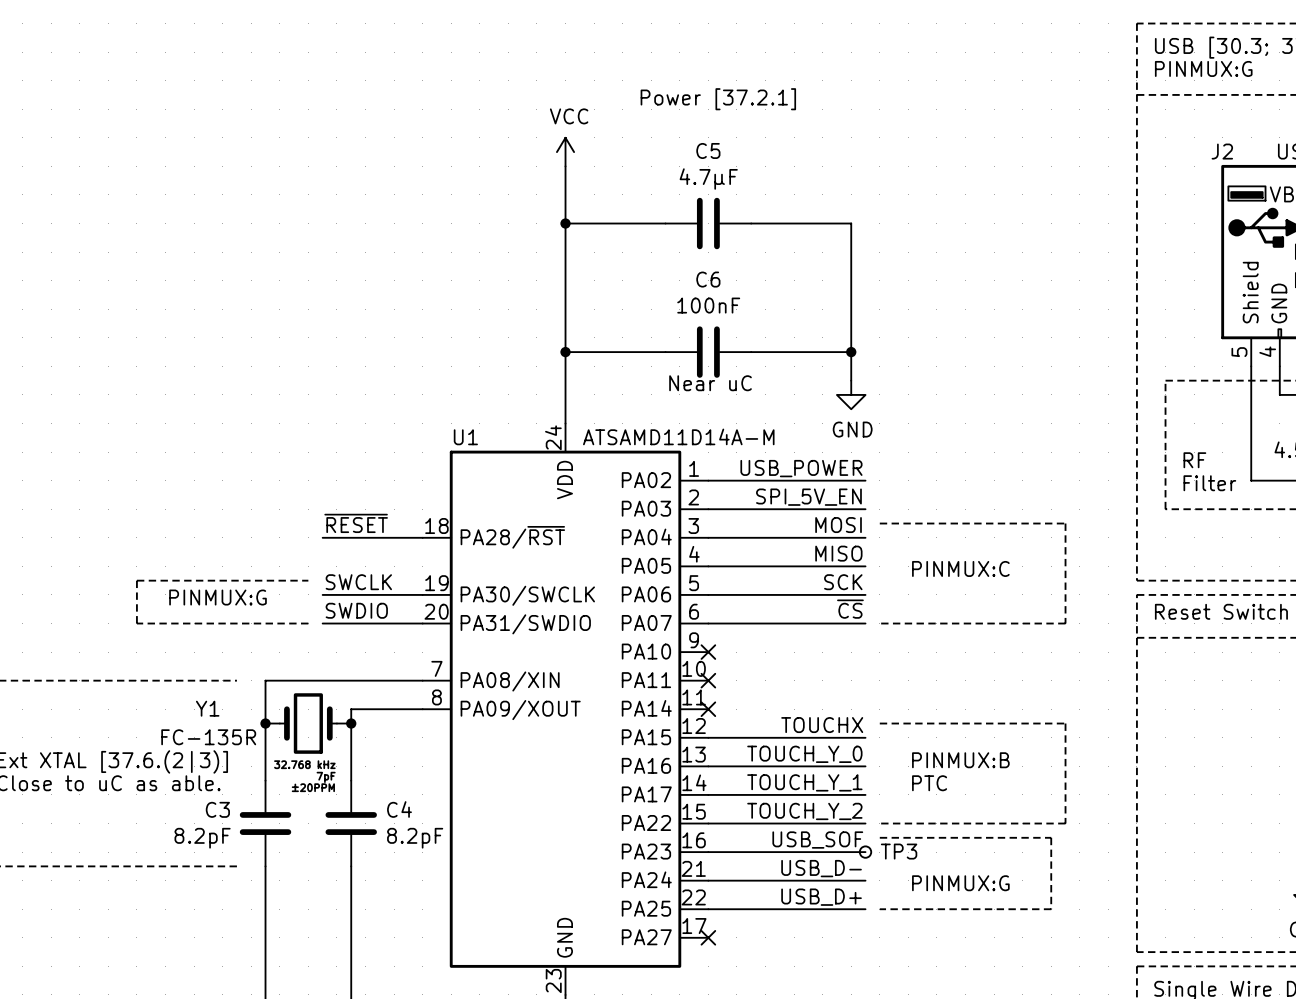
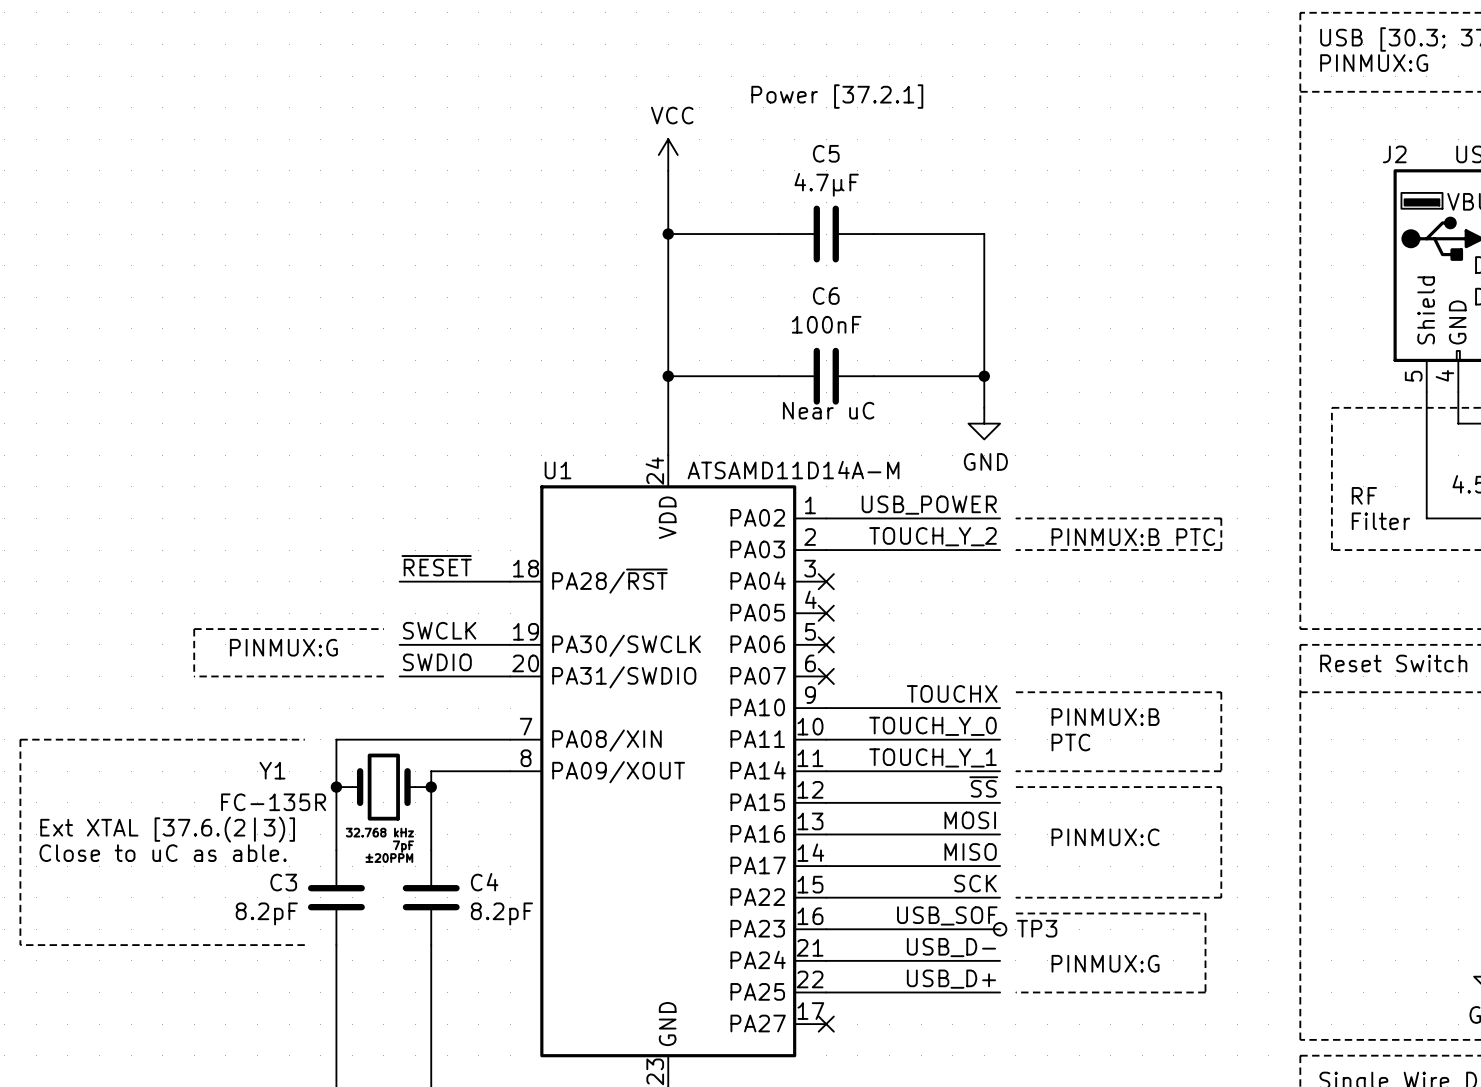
line: none -> (1015, 518) (1221, 518) (1221, 550) (1015, 550)
label: SPI_5V_EN (808, 497) -> TOUCH_Y_2 (933, 536)
text: none -> PINMUX:B PTC (1133, 537)
line: (879, 523) (1065, 523) (1065, 623) (879, 623) -> none
label: MOSI (838, 525) -> none
wire: (708, 537) (865, 537) -> none
no-connect mark: none -> (826, 581)
label: MISO (838, 553) -> none
wire: (708, 566) (865, 566) -> (826, 708) (1000, 708)
no-connect mark: none -> (826, 613)
text position: PINMUX:C (960, 568) -> PINMUX:C (1105, 837)
label: SCK (843, 582) -> none
wire: (708, 594) (865, 594) -> (826, 739) (1000, 739)
no-connect mark: none -> (826, 644)
label: ~{CS} (850, 609) -> none
wire: (708, 623) (865, 623) -> (826, 771) (1000, 771)
no-connect mark: none -> (826, 676)
line: none -> (1015, 692) (1221, 692) (1221, 771) (1015, 771)
label: none -> TOUCHX (952, 693)
no-connect mark: (708, 652) -> none
label: none -> TOUCH_Y_0 (933, 726)
no-connect mark: (708, 680) -> none
label: none -> TOUCH_Y_1 (933, 757)
no-connect mark: (708, 709) -> none
label: TOUCHX (822, 725) -> ~{SS} (983, 786)
label: TOUCH_Y_0 (804, 754) -> MOSI (970, 820)
text position: PINMUX:B (960, 760) -> PINMUX:B (1105, 717)
label: TOUCH_Y_1 (804, 782) -> MISO (970, 851)
text position: PTC (929, 783) -> PTC (1070, 742)
label: TOUCH_Y_2 (804, 811) -> SCK (975, 883)

